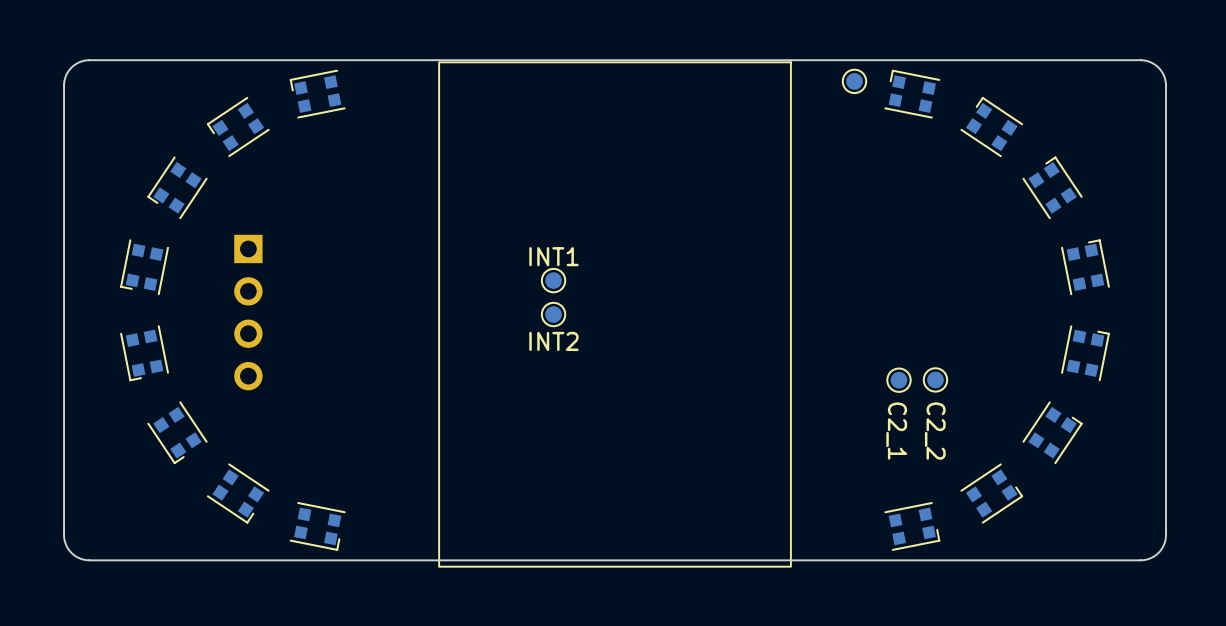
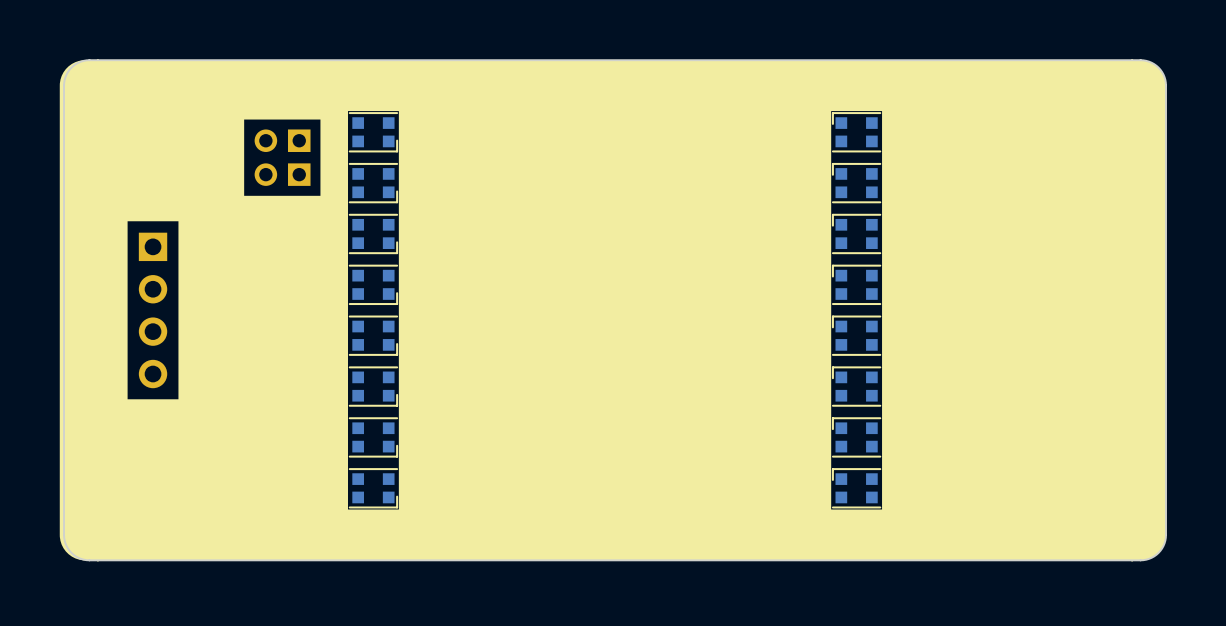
drawing: none -> [59, 60, 1167, 561]
part: (854, 81) -> none
part: (317, 94) -> none
part: (912, 94) -> none
part: (238, 127) -> none
part: (991, 127) -> none
part: none -> (373, 132)
part: none -> (856, 132)
part: none -> (282, 140)
part: none -> (282, 174)
part: none -> (373, 183)
part: none -> (856, 183)
part: (177, 187) -> none
part: (1052, 187) -> none
part: none -> (373, 233)
part: none -> (856, 233)
part: (144, 267) -> none
part: (1085, 267) -> none
part: INT1 (553, 280) -> none
part: none -> (373, 284)
part: none -> (856, 284)
part position: (248, 312) -> (153, 310)
part: INT2 (553, 314) -> none
part: (615, 314) -> none
part: none -> (373, 335)
part: none -> (856, 335)
part: (144, 353) -> none
part: (1085, 353) -> none
part: C2_2 (935, 379) -> none
part: C2_1 (898, 380) -> none
part: none -> (373, 386)
part: none -> (856, 386)
part: (177, 432) -> none
part: (1052, 432) -> none
part: none -> (373, 437)
part: none -> (856, 437)
part: none -> (373, 488)
part: none -> (856, 488)
part: (238, 493) -> none
part: (991, 493) -> none
part: (317, 526) -> none
part: (912, 526) -> none

